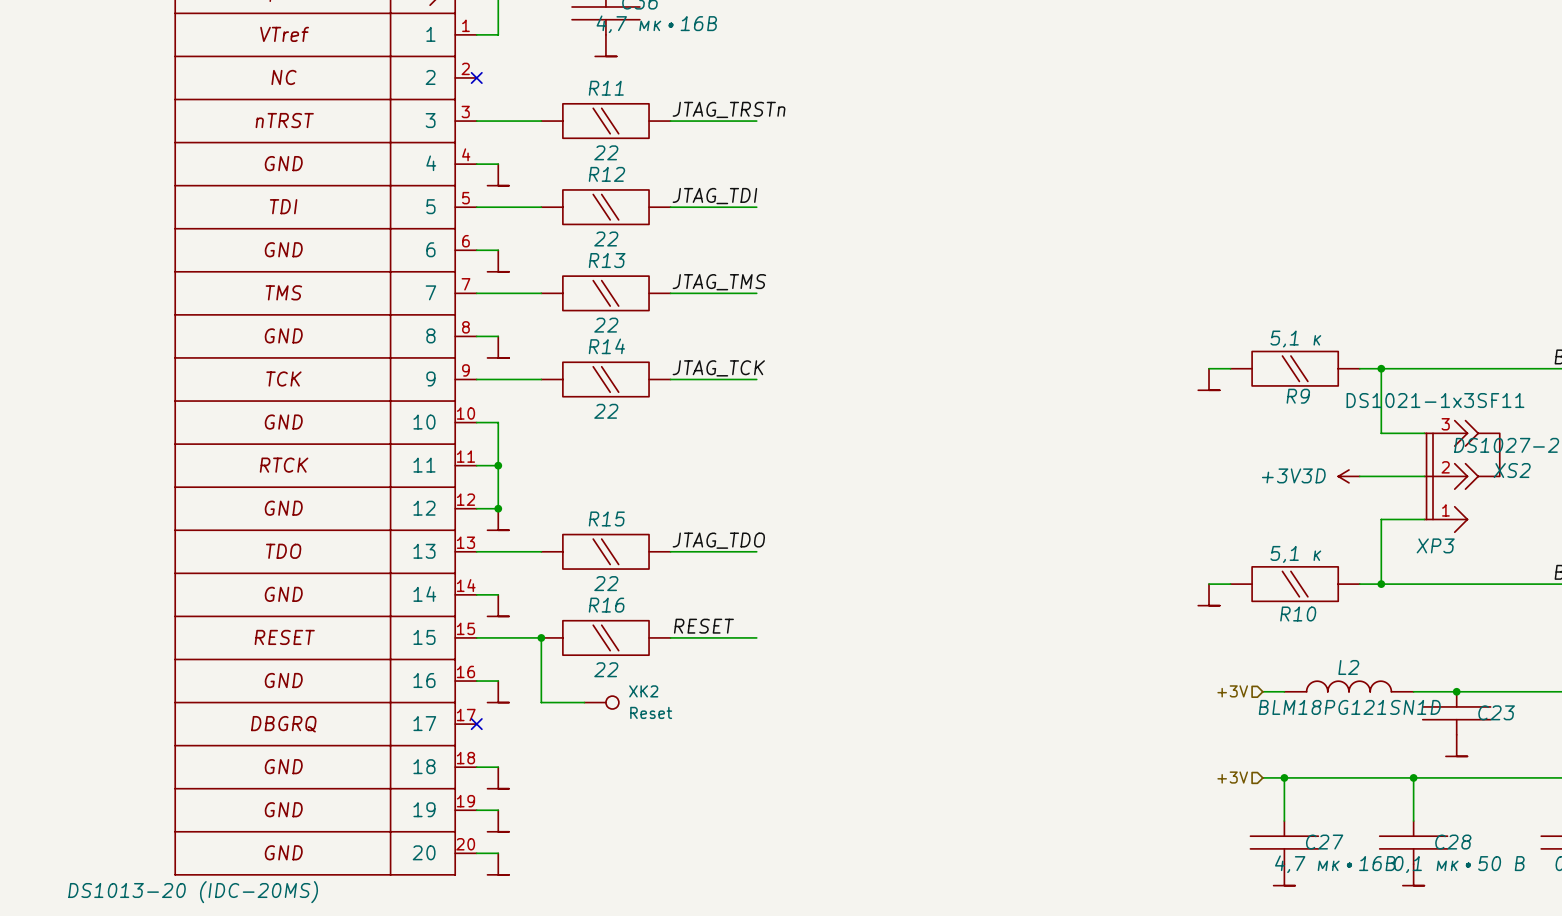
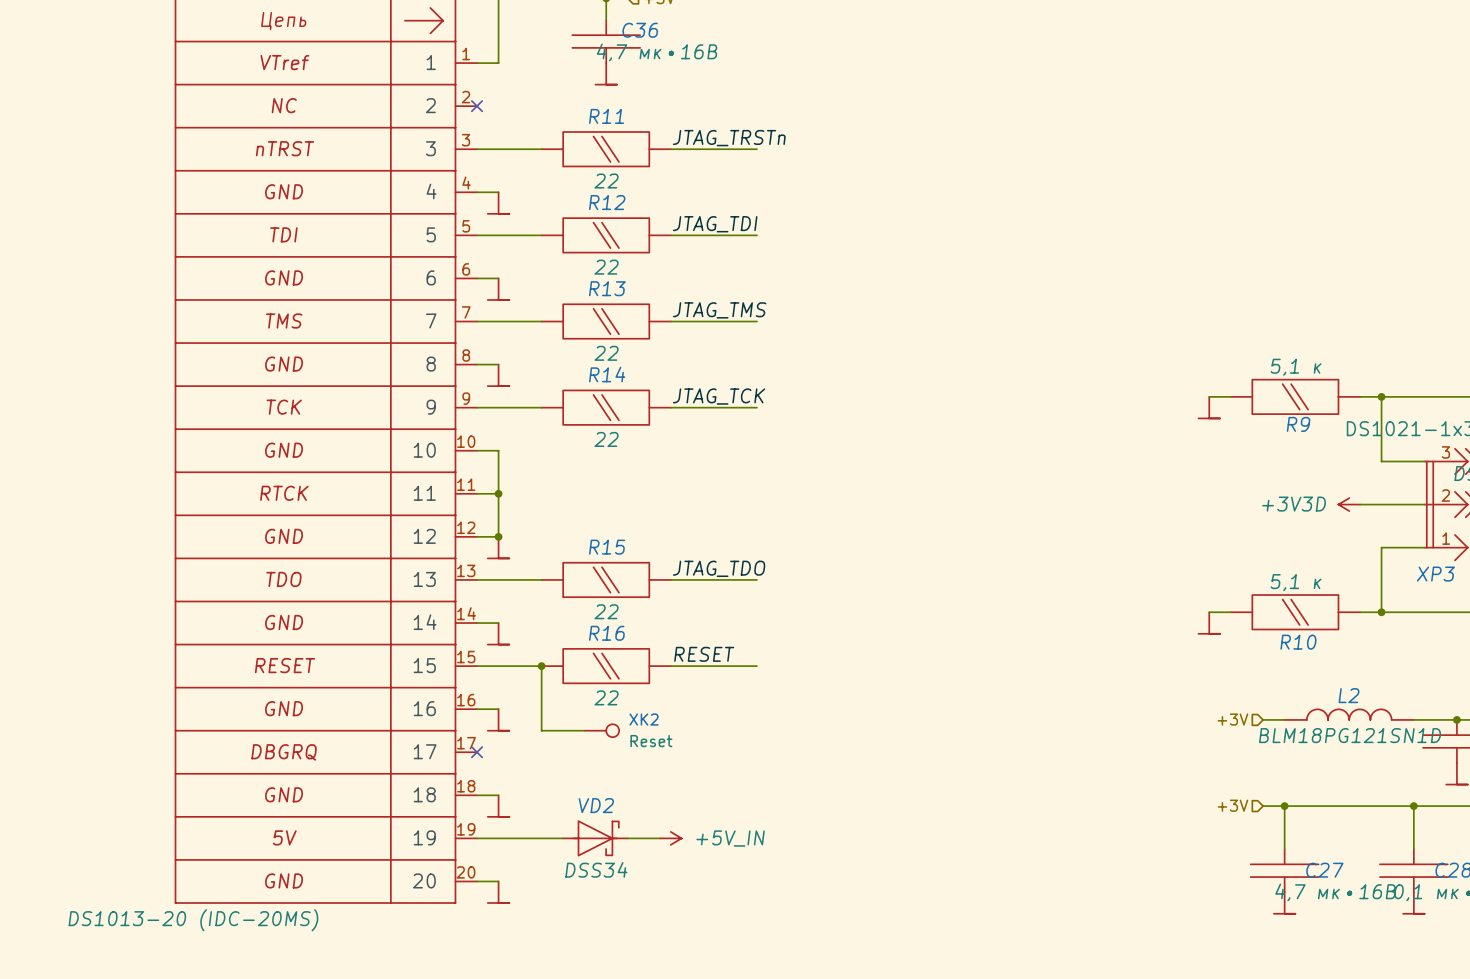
part text: GND (283, 809) -> 5V (284, 837)
wire: none -> (498, 838) (563, 838)
VD2: none -> DSS34 (595, 838)
wire: none -> (627, 838) (660, 838)
power symbol: none -> +5V_IN (670, 838)
power symbol: (498, 821) -> none

